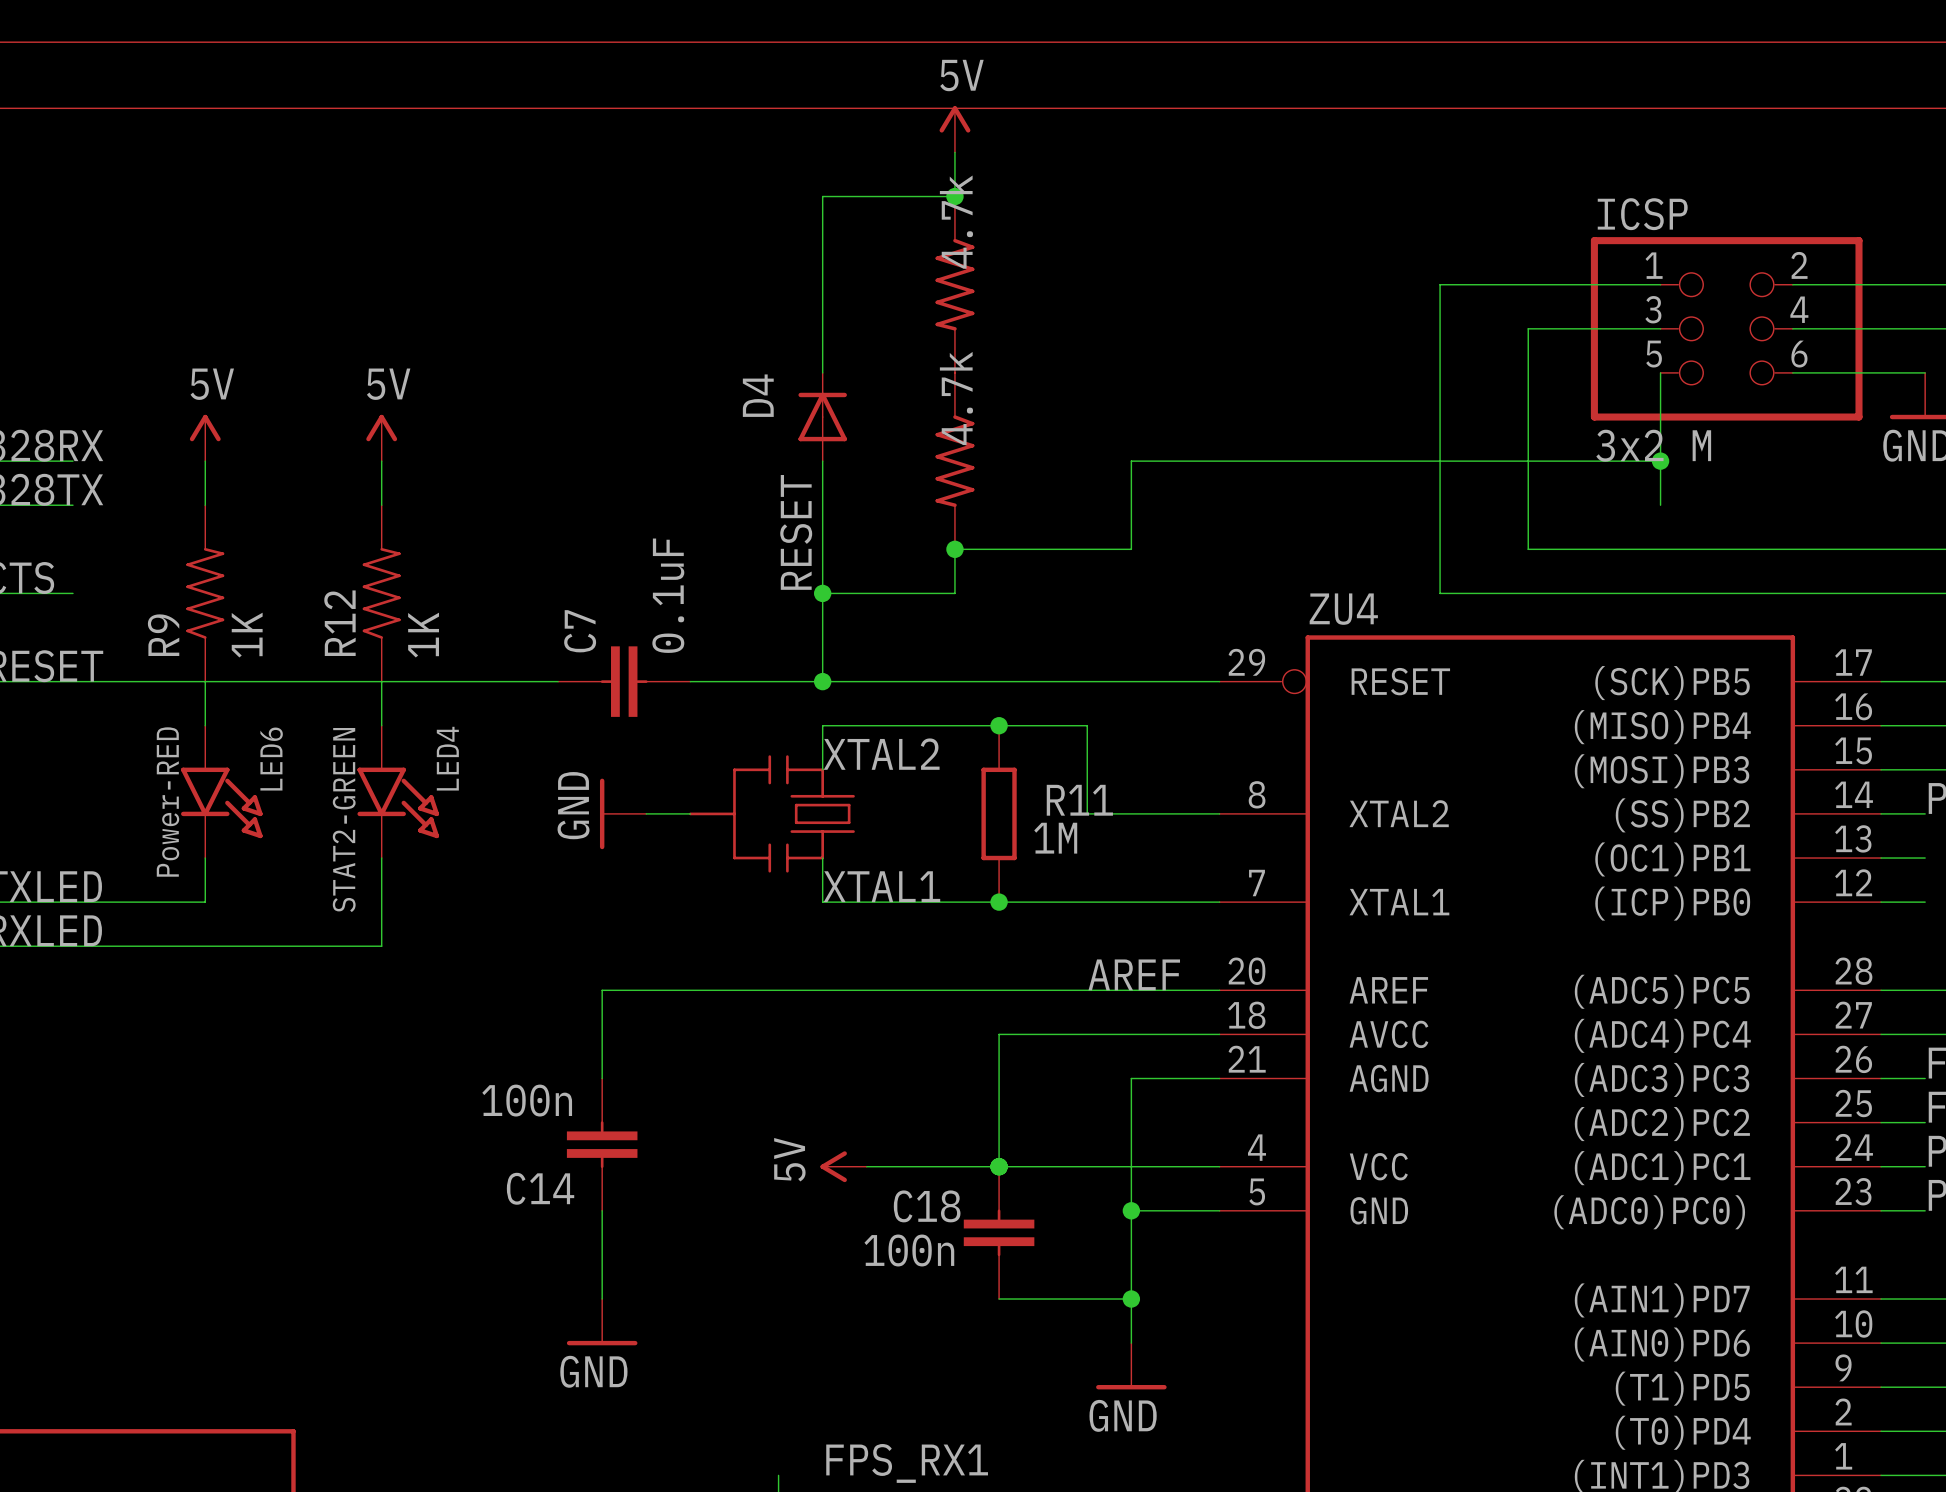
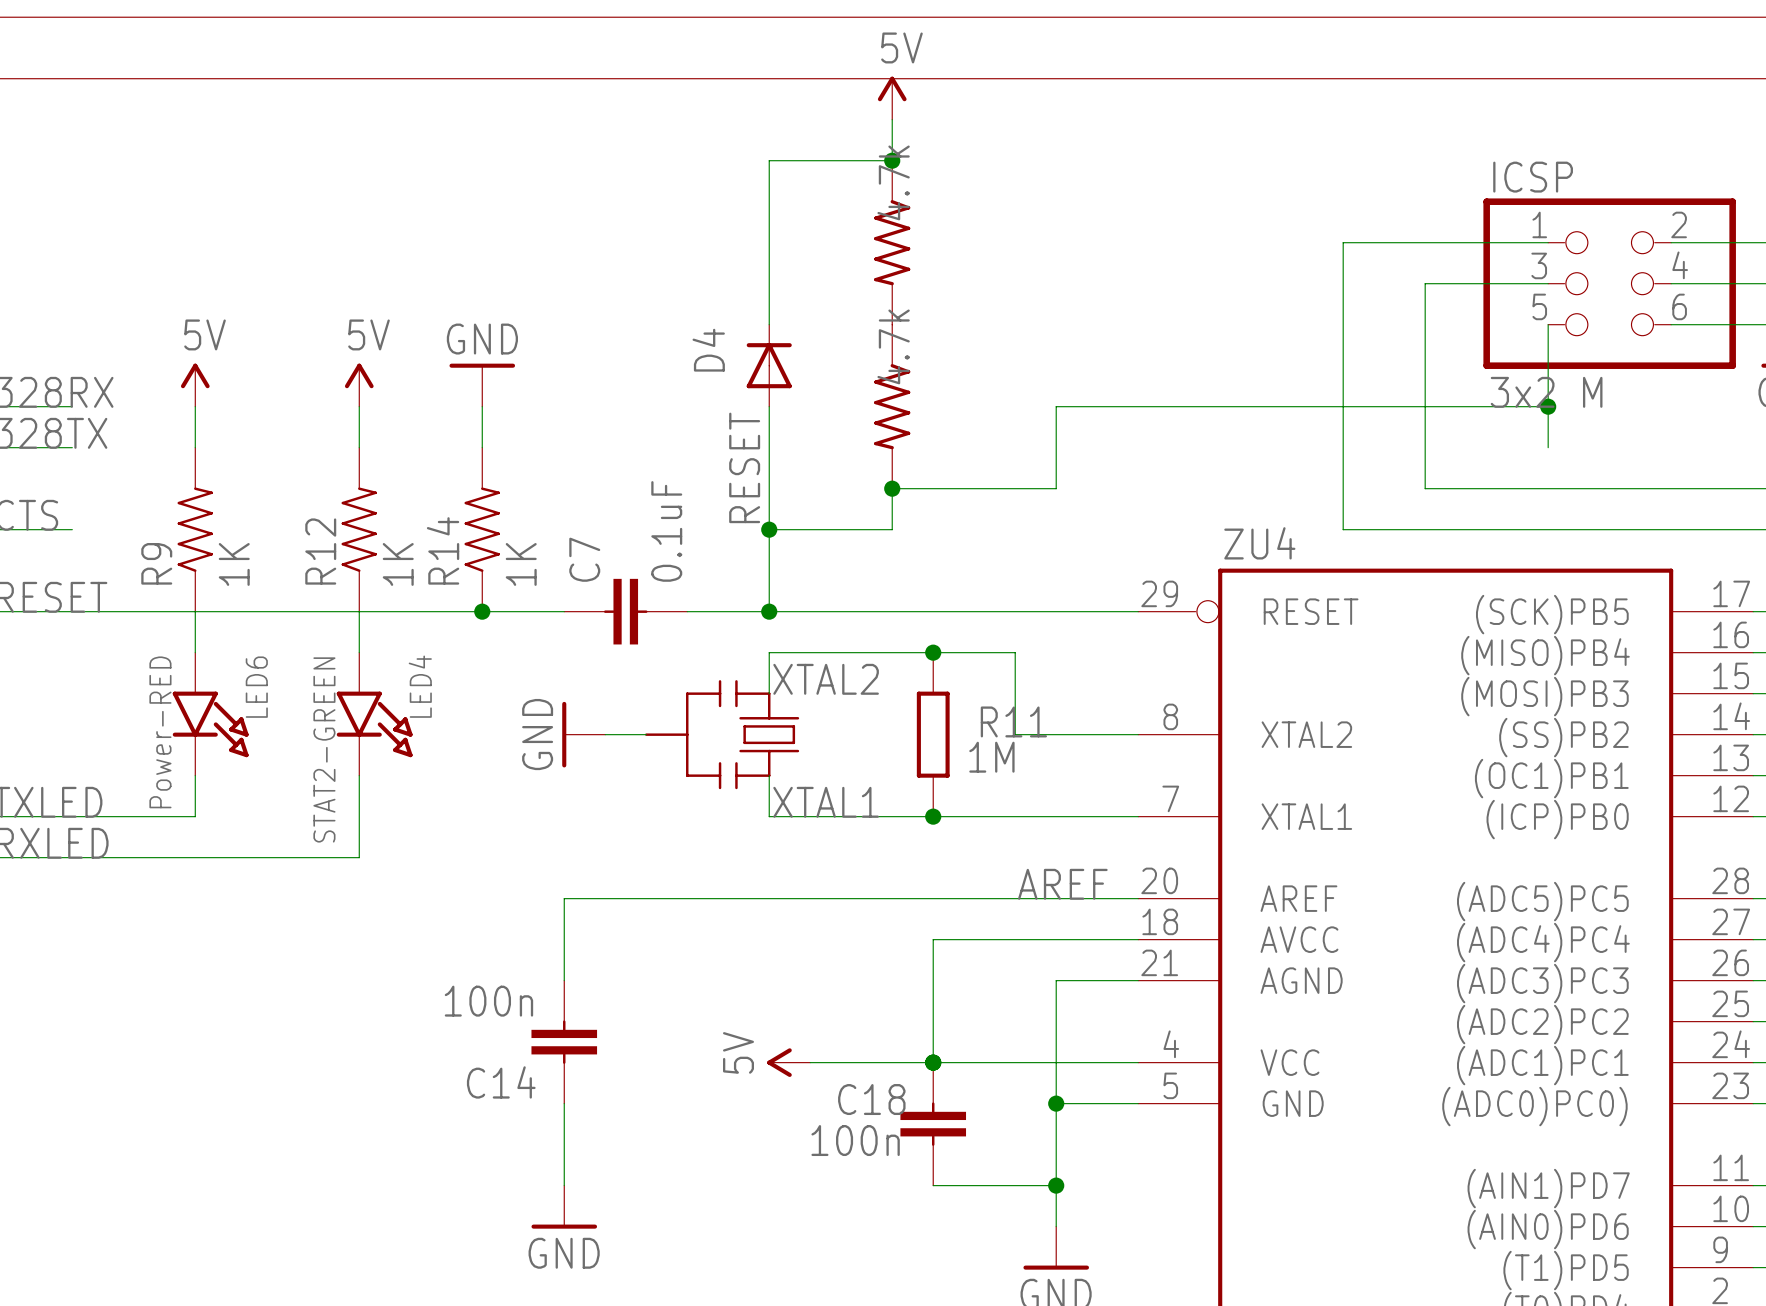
power symbol: none -> GND (482, 385)
wire: none -> (482, 406) (482, 447)
R14: none -> 1K (482, 529)
junction: none -> (482, 611)
C7 position: (624, 681) -> (625, 611)

